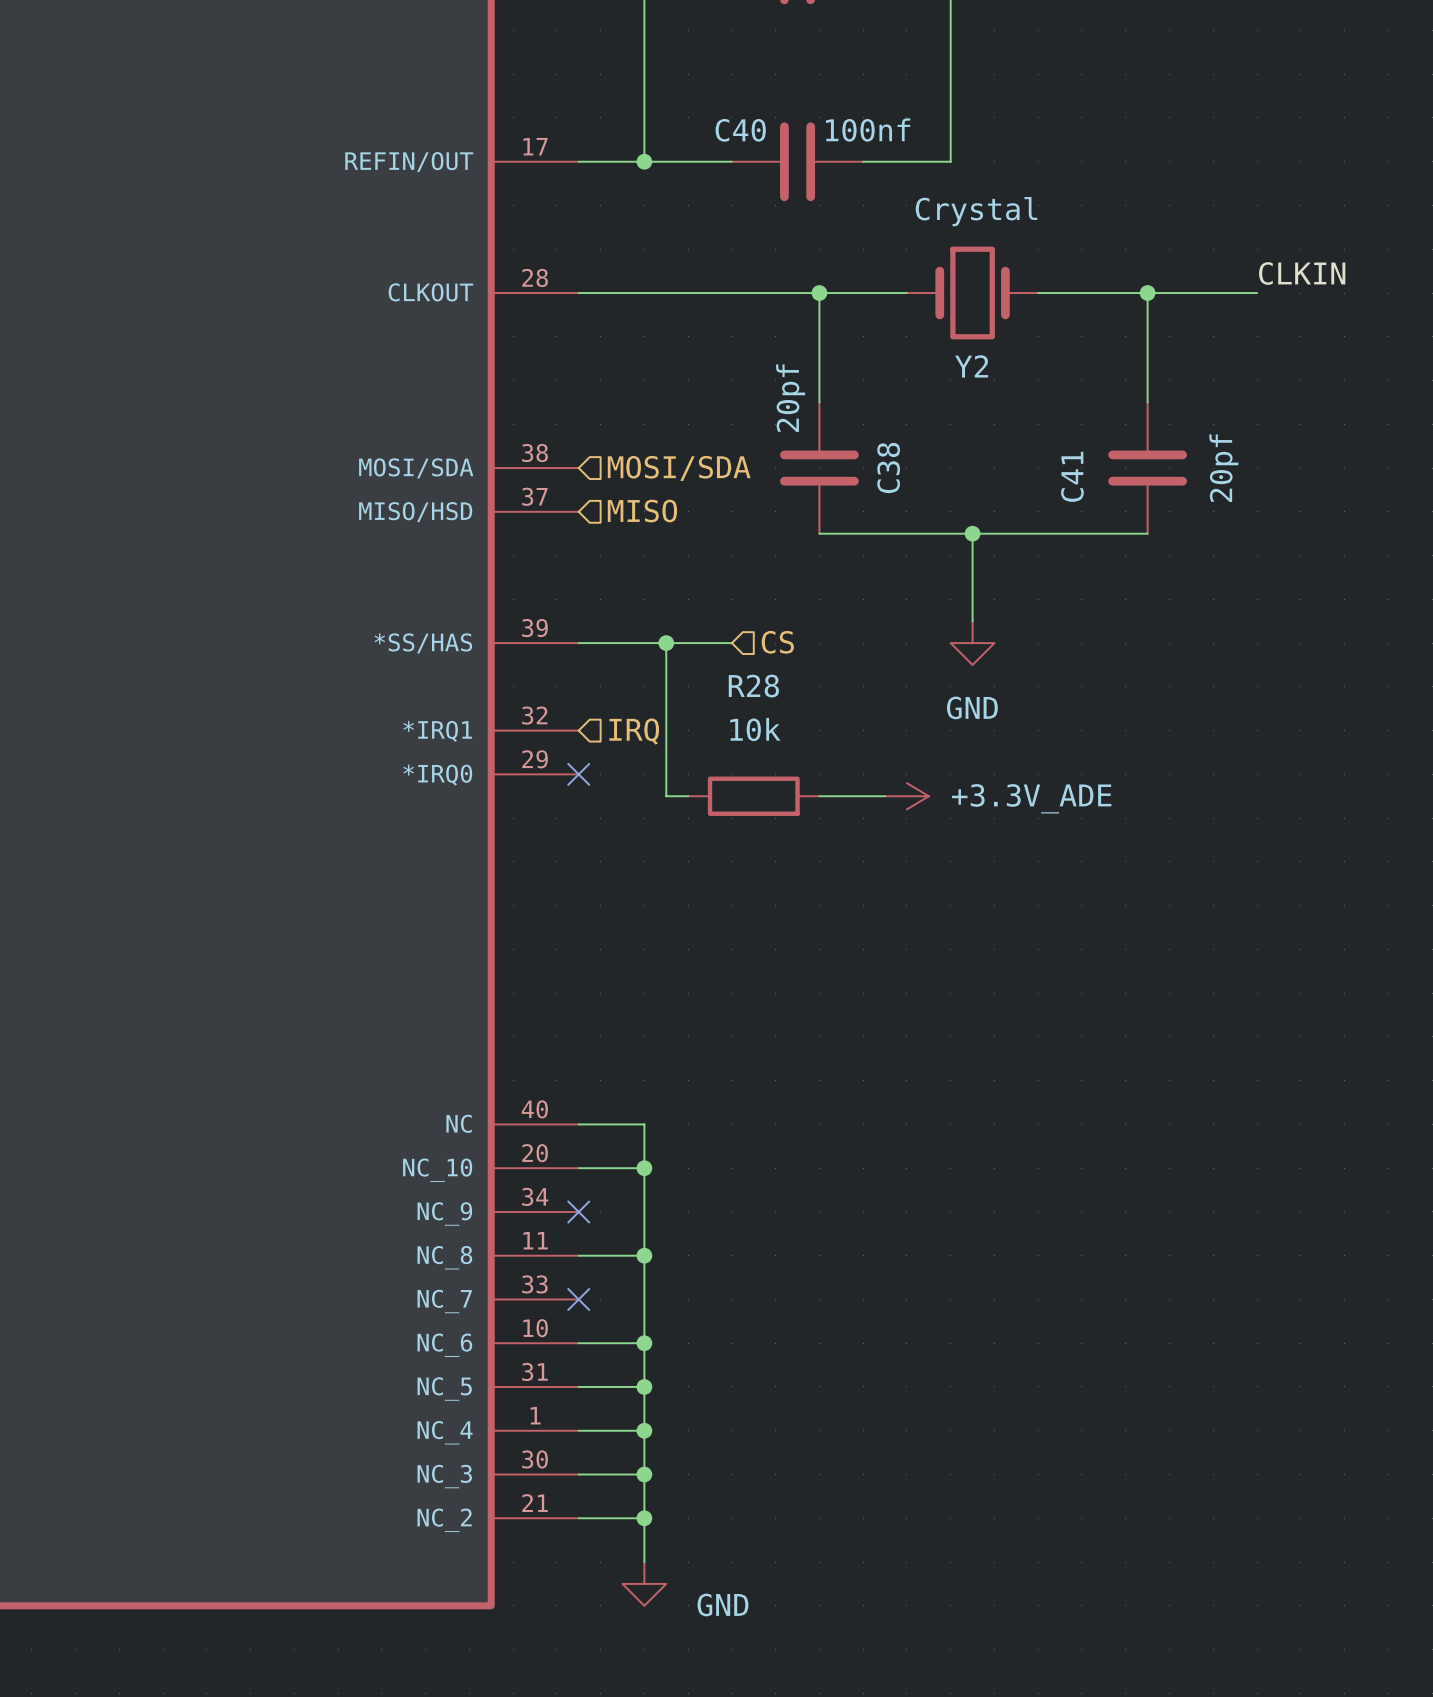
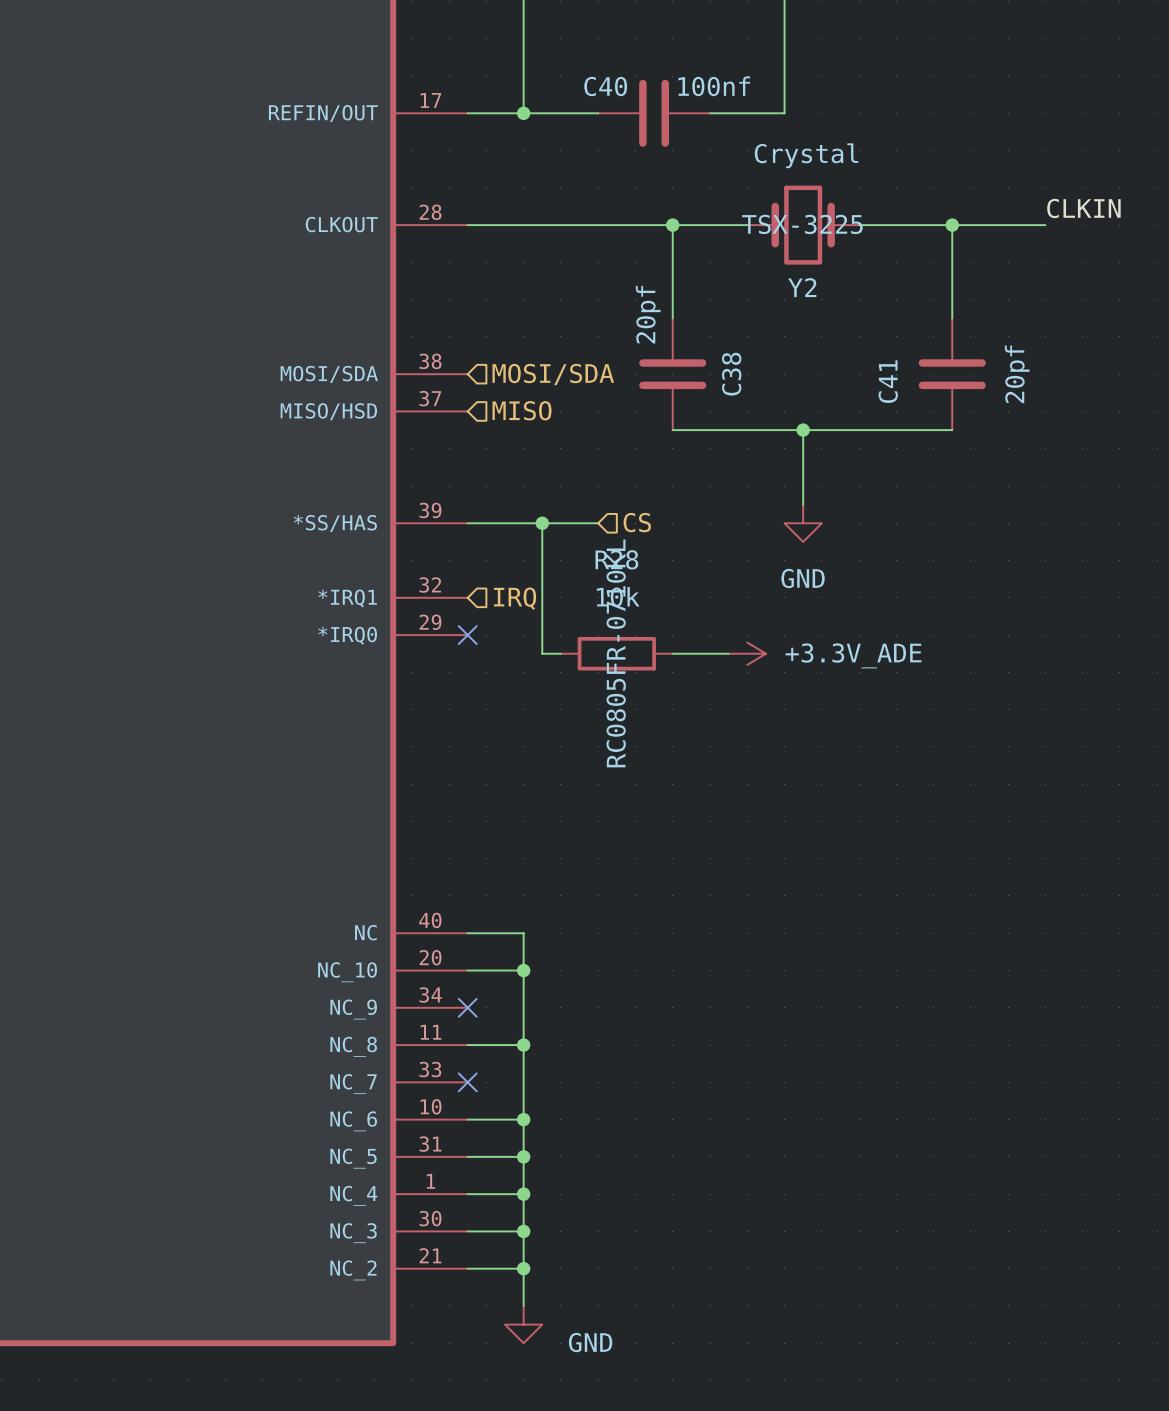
Y2 text: none -> TSX-3225 (802, 224)
R28 text: none -> RC0805FR-0710KL (616, 653)

